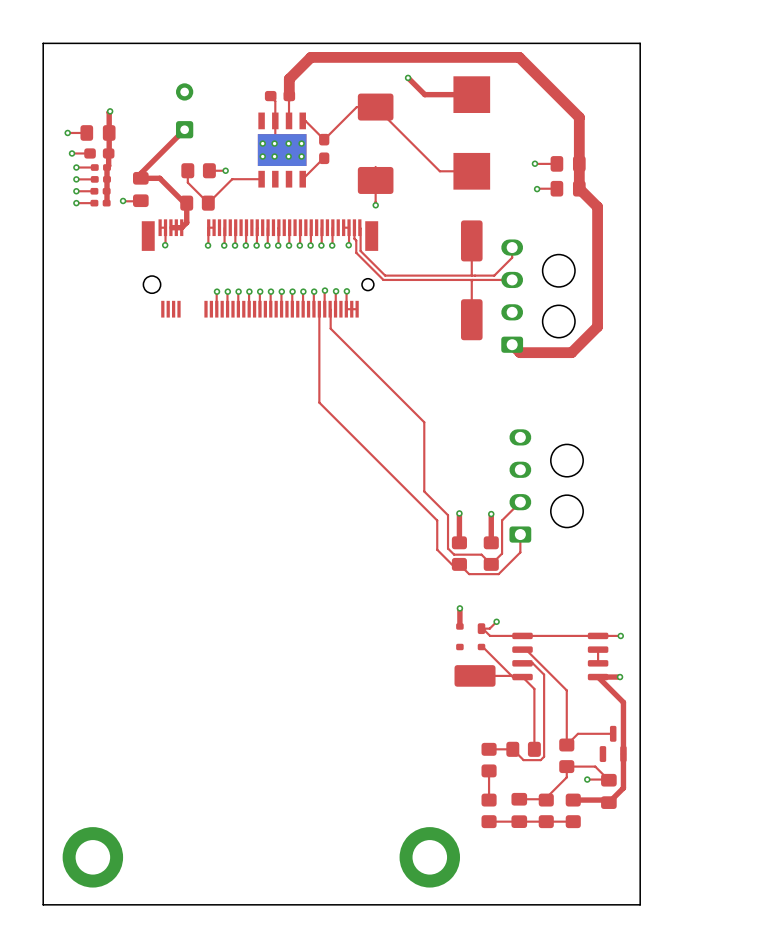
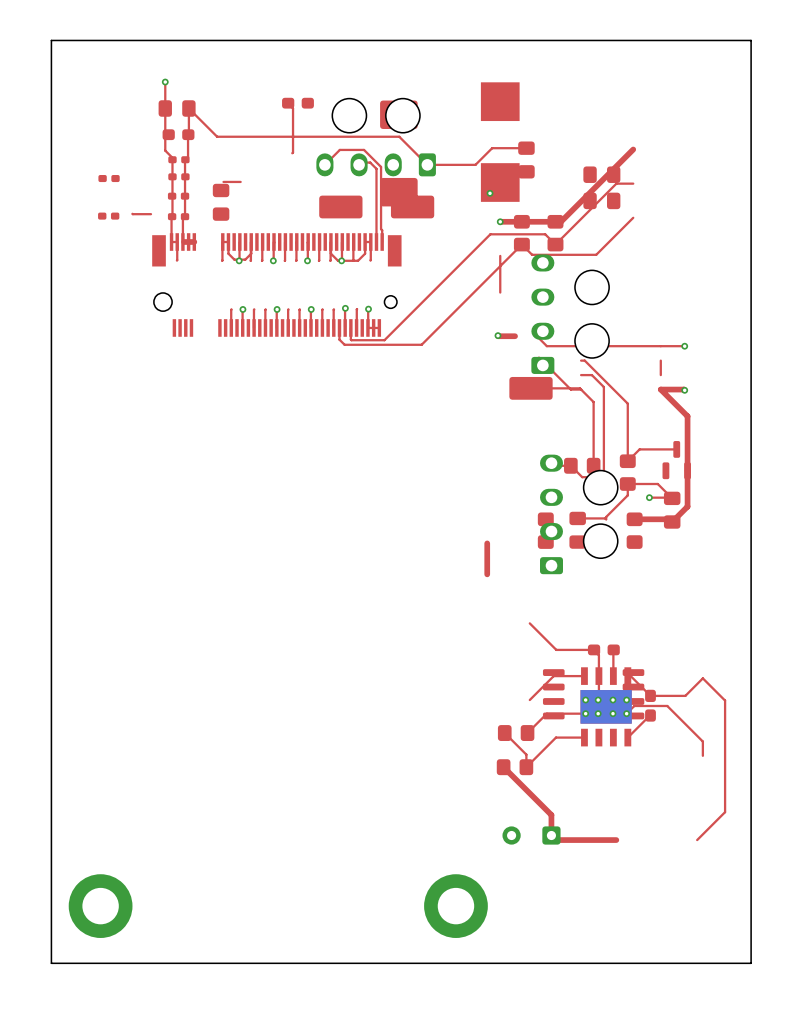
board edge: (640, 43) (43, 43) (43, 904) (640, 904) (640, 43) -> (751, 40) (751, 963) (51, 963) (51, 40) (751, 40)
top track: none -> (165, 82) (165, 150) (172, 157) (171, 242)
via: none -> (165, 82)
top track: (408, 77) (424, 94) (471, 94) -> none
via: (408, 77) -> none
top track: (289, 96) (289, 79) (310, 57) (519, 57) (579, 117) (579, 188) (597, 206) (597, 326) (571, 352) (520, 352) (510, 343) -> none
top track: (289, 96) (289, 120) -> none
part: none -> (177, 108)
part: (184, 110) -> none
top track: (110, 111) (106, 203) -> none
via: (110, 111) -> none
top track: (302, 120) (305, 120) (324, 139) (356, 107) (375, 107) (439, 171) (471, 171) -> none
part: none -> (376, 137)
top track: (184, 129) (140, 173) (140, 178) (159, 178) (186, 203) (186, 222) (181, 227) -> none
via: (67, 132) -> none
top track: (86, 132) (67, 132) -> none
part: (97, 132) -> none
top track: none -> (526, 148) (492, 148) (475, 164) (427, 164)
top track: none -> (633, 149) (560, 221) (500, 221)
part: (324, 148) -> none
part: none -> (178, 159)
part: none -> (526, 159)
part: (282, 150) -> none
via: (72, 153) -> none
top track: (90, 153) (72, 153) -> none
part position: (99, 153) -> (178, 134)
top track: none -> (427, 164) (399, 136) (217, 136) (188, 108) (188, 157) (185, 160) (184, 242)
top track: (324, 158) (302, 179) -> none
via: (534, 163) -> none
top track: (556, 163) (535, 163) -> none
part: none -> (178, 176)
via: (76, 167) -> none
top track: (94, 167) (76, 167) -> none
top track: (187, 170) (187, 182) (208, 203) (232, 179) (261, 179) -> none
part: (198, 170) -> none
via: (225, 170) -> none
via: (76, 179) -> none
top track: (94, 179) (76, 179) -> none
part: (100, 179) -> none
via: none -> (490, 193)
part: none -> (178, 196)
top track: (556, 188) (539, 188) -> none
part: (140, 189) -> none
via: (537, 189) -> none
part: none -> (221, 202)
via: (76, 191) -> none
top track: (94, 191) (76, 191) -> none
part: (100, 191) -> none
part: none -> (340, 206)
part: none -> (412, 206)
via: (123, 200) -> none
via: (76, 203) -> none
top track: (94, 203) (76, 203) -> none
part: none -> (178, 216)
part: (197, 203) -> none
via: (375, 205) -> none
via: none -> (500, 221)
part: none -> (521, 233)
part: none -> (555, 233)
top track: none -> (251, 242) (251, 253) (245, 259) (234, 259) (228, 253) (228, 242)
top track: none -> (365, 242) (365, 253) (358, 260) (338, 260) (330, 253) (330, 242)
top track: (354, 227) (356, 252) (383, 279) (512, 279) -> (376, 242) (376, 168) (370, 162) (361, 162) (359, 164)
top track: (359, 227) (360, 251) (385, 275) (494, 275) (512, 257) (512, 247) -> (382, 242) (381, 166) (364, 149) (339, 149) (324, 164)
part: (471, 240) -> none
via: (165, 245) -> none
via: (208, 245) -> none
via: (235, 245) -> none
via: (245, 245) -> none
via: (267, 245) -> none
via: (278, 245) -> none
via: (299, 245) -> none
via: (310, 245) -> none
via: (332, 245) -> none
via: (348, 245) -> none
top track: (472, 279) (471, 319) -> none
via: (217, 291) -> none
via: (238, 291) -> none
via: (249, 291) -> none
via: (270, 291) -> none
via: (281, 291) -> none
via: (303, 291) -> none
via: (314, 291) -> none
via: (336, 291) -> none
top track: (330, 309) (330, 328) (424, 422) (424, 491) (448, 515) (448, 548) (454, 554) (481, 554) (491, 564) (502, 553) (502, 520) (520, 502) -> (350, 327) (351, 340) (384, 340) (490, 234) (545, 234) (555, 244) (616, 183) (633, 183)
top track: none -> (497, 335) (515, 336)
via: none -> (497, 335)
top track: none -> (538, 338) (546, 346) (684, 346)
part rotation: 0° (471, 319) -> 90° clockwise (531, 388)
part position: (471, 319) -> (531, 388)
top track: (319, 320) (319, 402) (437, 520) (437, 549) (451, 564) (459, 564) (469, 574) (498, 574) (520, 552) (520, 534) -> (339, 339) (344, 344) (421, 344) (521, 244) (532, 254) (596, 254) (633, 217)
via: none -> (684, 346)
top track: none -> (538, 357) (570, 389) (581, 389)
top track: none -> (581, 360) (584, 360) (627, 403) (627, 461) (639, 449) (676, 449)
top track: none -> (660, 360) (660, 375)
top track: none -> (581, 375) (591, 375) (603, 387) (603, 473) (600, 477) (582, 477) (570, 465) (545, 465)
top track: none -> (531, 388) (579, 388) (593, 402) (593, 465)
top track: none -> (684, 390) (660, 389) (687, 416) (687, 506) (672, 522) (669, 519) (634, 519)
via: none -> (684, 390)
part: none -> (676, 460)
part: none -> (582, 465)
part: none -> (627, 472)
via: none -> (649, 497)
top track: none -> (671, 497) (649, 497)
top track: none -> (672, 498) (657, 484) (627, 484) (627, 495) (606, 517) (606, 519) (577, 518)
part: none -> (672, 510)
part: none -> (577, 530)
part: none -> (545, 530)
part: none -> (634, 530)
via: (459, 513) -> none
top track: (491, 514) (491, 542) -> none
via: (491, 514) -> none
part: (459, 553) -> none
part: (491, 553) -> none
top track: none -> (529, 623) (556, 649) (594, 649) (598, 655) (598, 700)
top track: (459, 608) (459, 626) -> none
via: (459, 608) -> none
part: none -> (603, 649)
top track: none -> (613, 649) (613, 676)
top track: (496, 621) (489, 628) (481, 628) -> none
via: (496, 621) -> none
top track: (482, 628) (490, 635) (620, 635) -> none
via: (620, 635) -> none
part: (470, 636) -> none
top track: none -> (584, 676) (553, 676) (529, 700)
top track: none -> (627, 676) (630, 676) (650, 695) (685, 695) (702, 678) (725, 700) (725, 812) (697, 840)
top track: (482, 646) (512, 677) (522, 677) -> none
top track: (522, 649) (525, 649) (566, 690) (566, 745) (577, 733) (613, 733) -> none
top track: (598, 649) (598, 663) -> none
top track: (522, 663) (532, 663) (544, 674) (544, 756) (540, 760) (523, 760) (512, 749) (489, 749) -> none
part: none -> (650, 705)
part: none -> (606, 706)
top track: none -> (585, 713) (546, 713) (527, 733)
top track: none -> (626, 713) (634, 705) (667, 705) (702, 741) (702, 755)
top track: (475, 675) (521, 675) (534, 688) (534, 749) -> none
part: (475, 675) -> none
top track: none -> (650, 715) (627, 737)
top track: (620, 677) (598, 677) (623, 702) (623, 788) (608, 802) (606, 800) (573, 800) -> none
via: (620, 677) -> none
top track: none -> (504, 733) (526, 754) (526, 767) (555, 737) (584, 737)
part: none -> (516, 733)
top track: none -> (503, 767) (551, 815) (551, 835) (555, 840) (616, 840)
part: none -> (515, 767)
part: (613, 743) -> none
part: (523, 749) -> none
part: (566, 755) -> none
part: (489, 760) -> none
top track: (489, 770) (489, 800) -> none
via: (587, 779) -> none
top track: (608, 779) (587, 779) -> none
top track: (608, 780) (595, 766) (566, 766) (566, 777) (546, 800) (519, 799) -> none
part: none -> (531, 835)
part: (608, 791) -> none
part: (489, 810) -> none
part: (519, 810) -> none
part: (546, 810) -> none
part: (573, 810) -> none
top track: (573, 821) (489, 821) -> none

